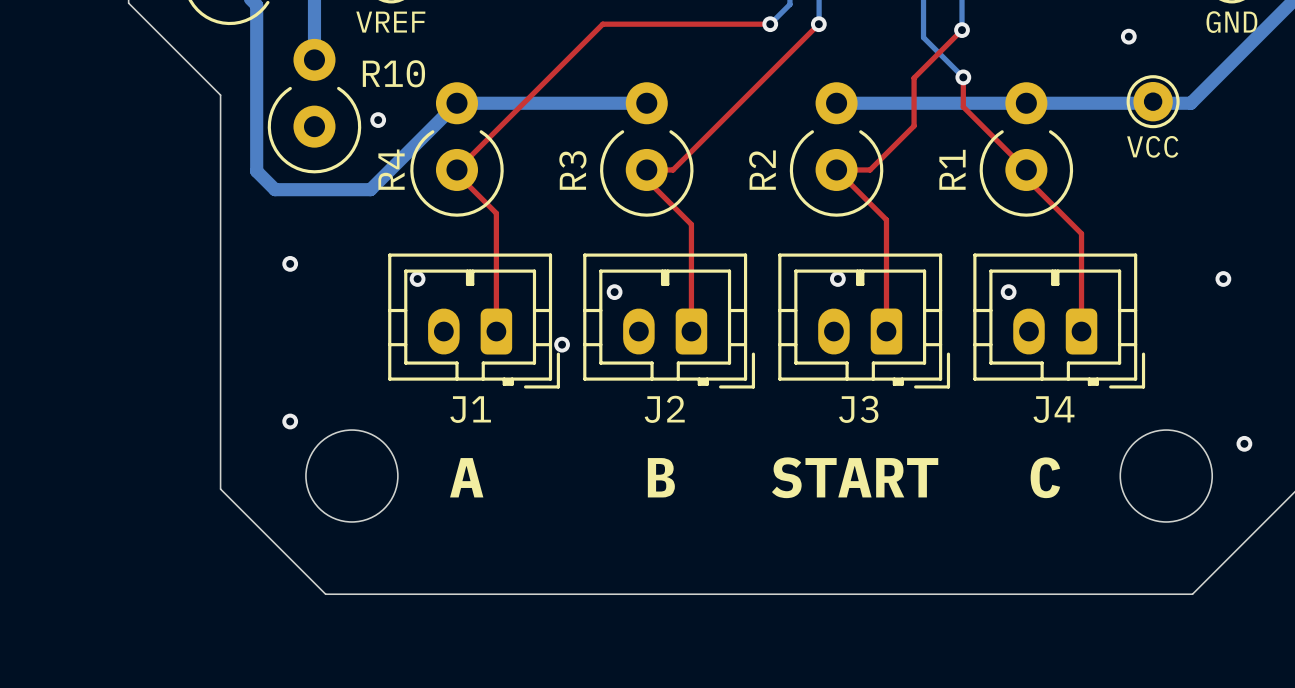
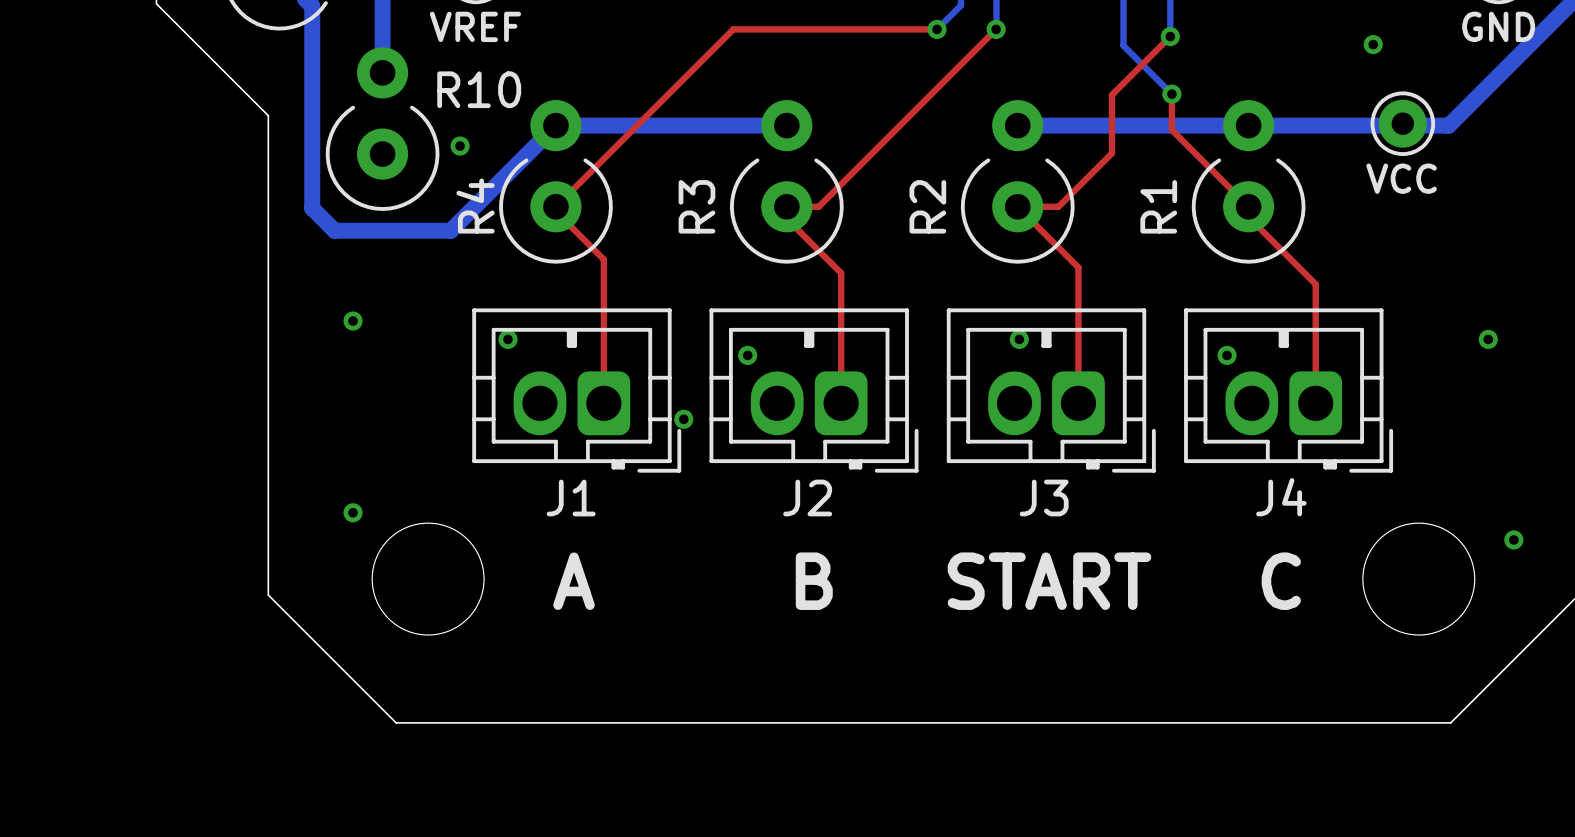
J1 footprint: [388, 253, 560, 389] -> [472, 308, 682, 473]
J2 footprint: [583, 253, 756, 389] -> [709, 308, 919, 473]
J3 footprint: [778, 253, 951, 389] -> [946, 308, 1156, 473]
J4 footprint: [973, 253, 1146, 389] -> [1184, 308, 1394, 473]

